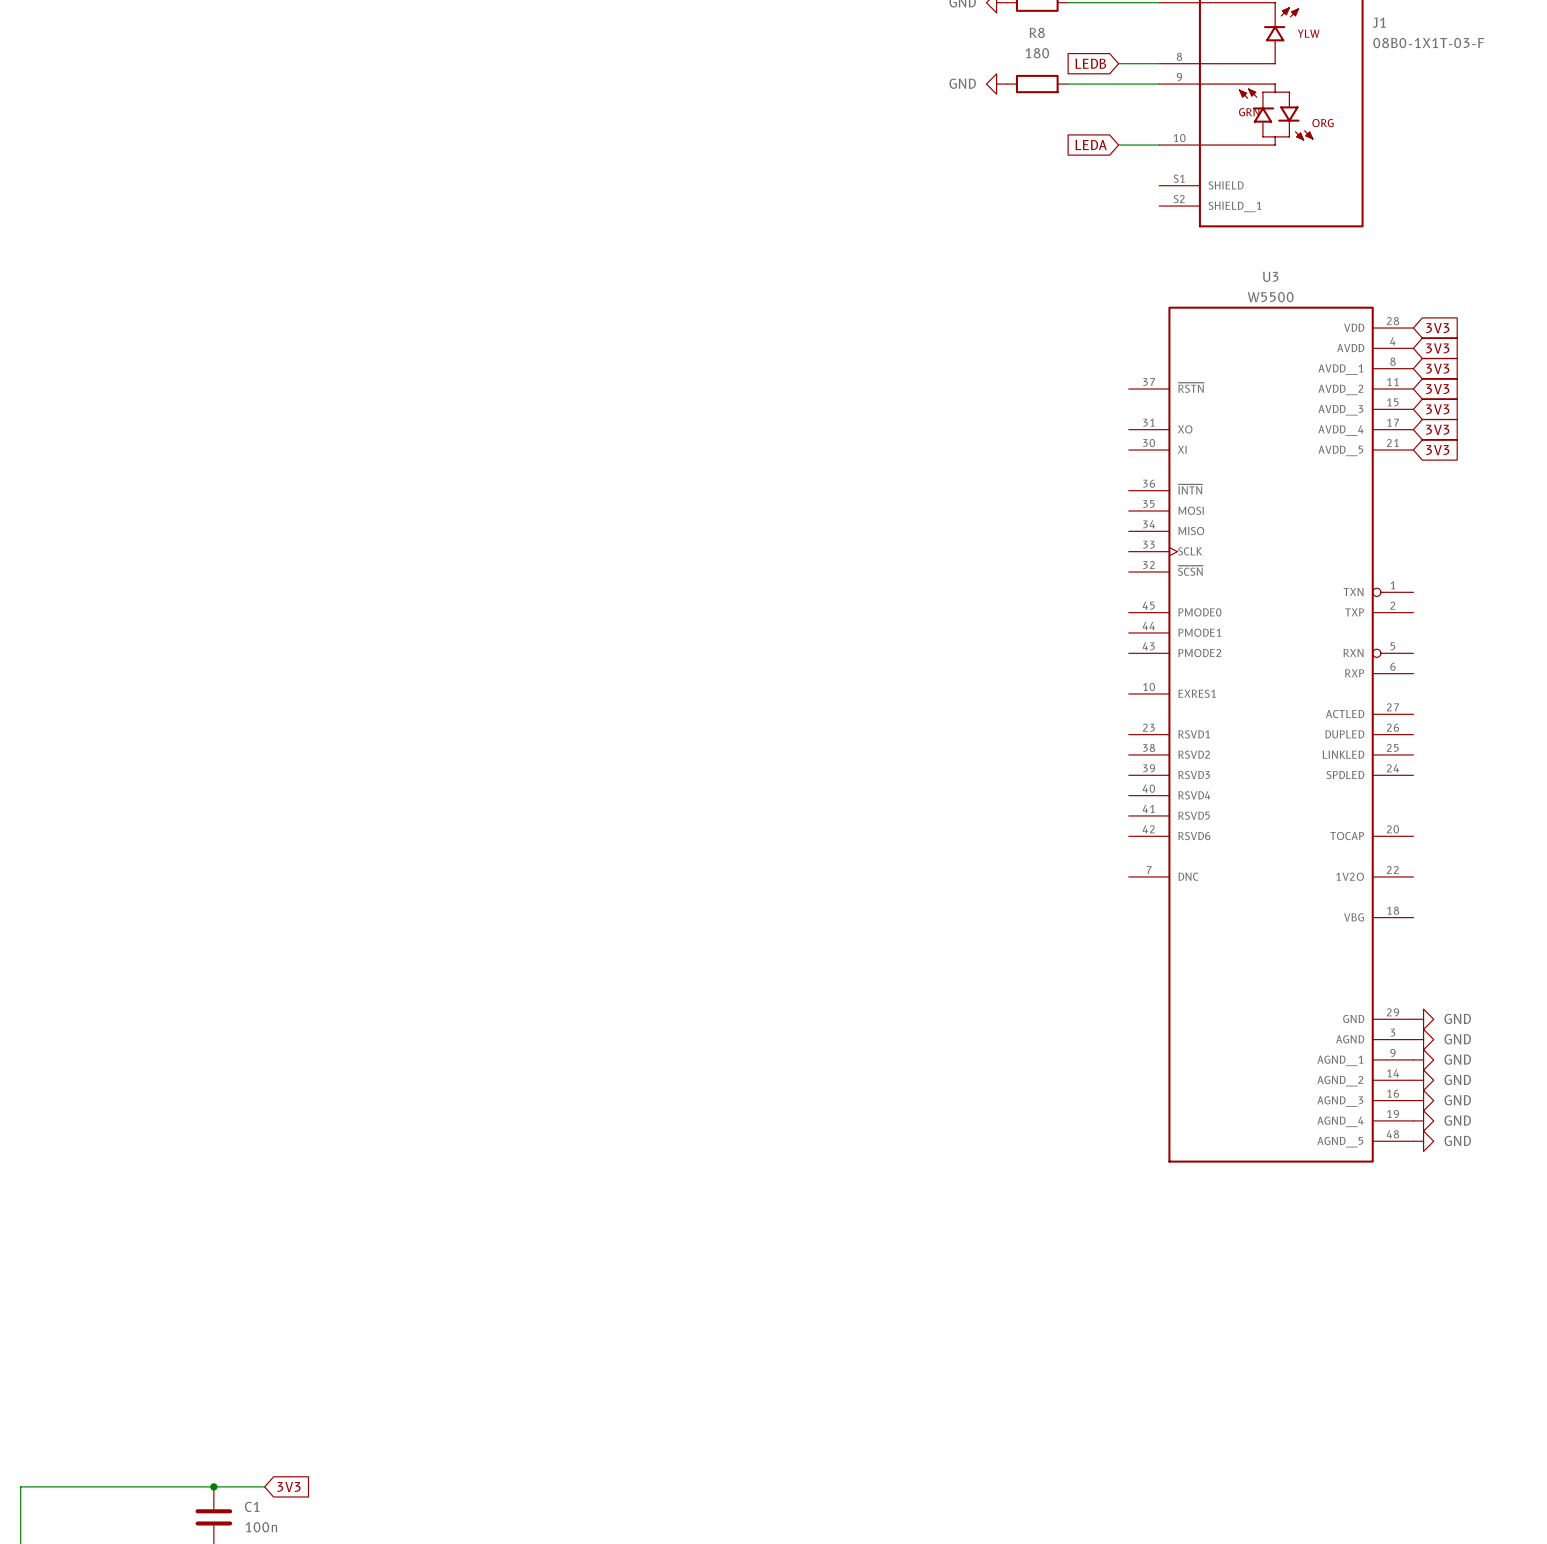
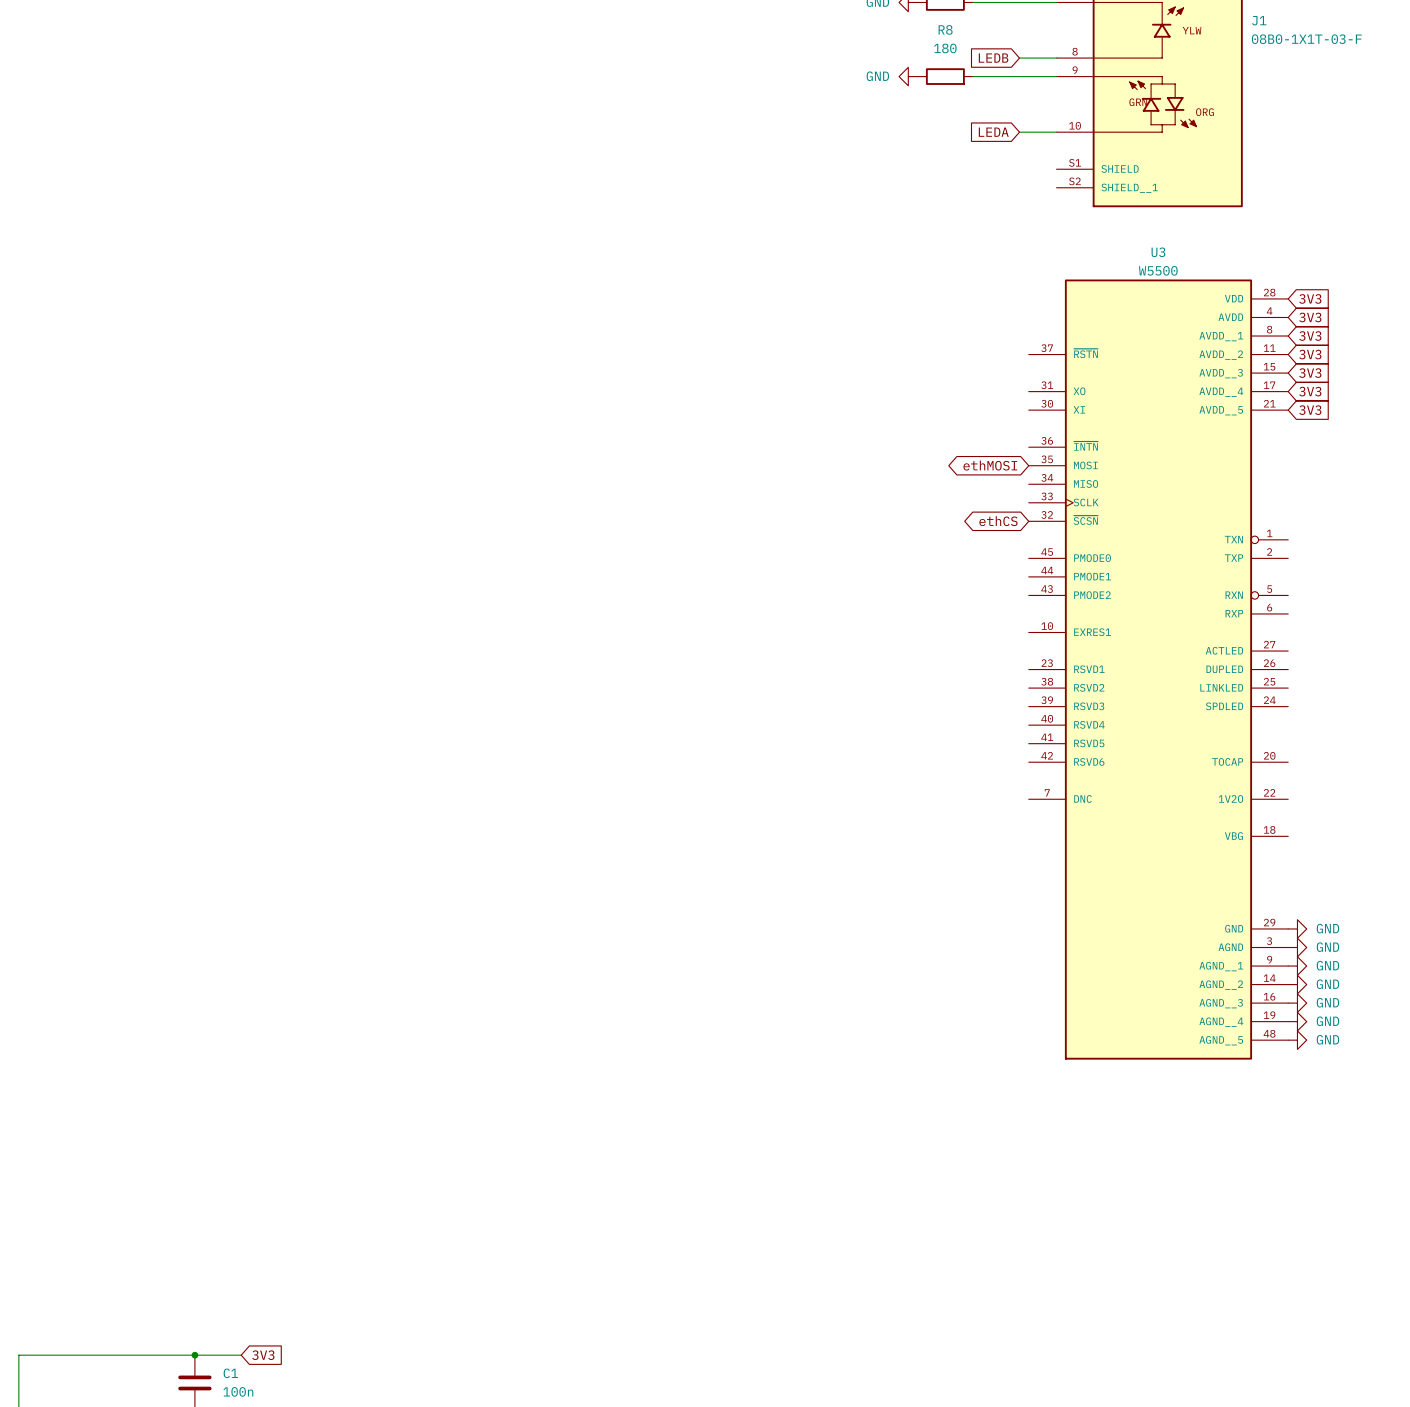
global label: none -> ethMOSI (990, 465)
global label: none -> ethCS (998, 521)

